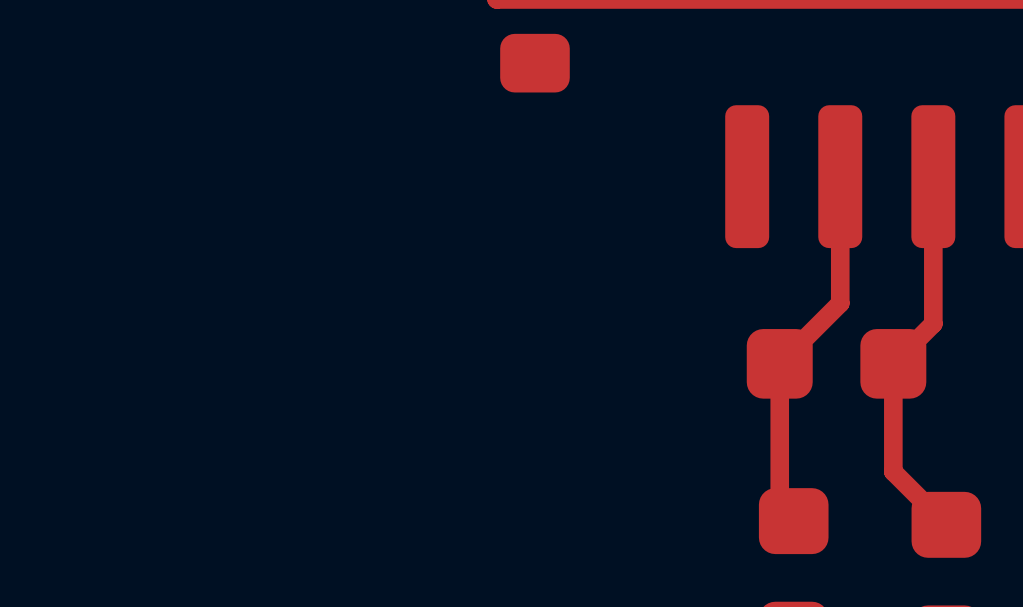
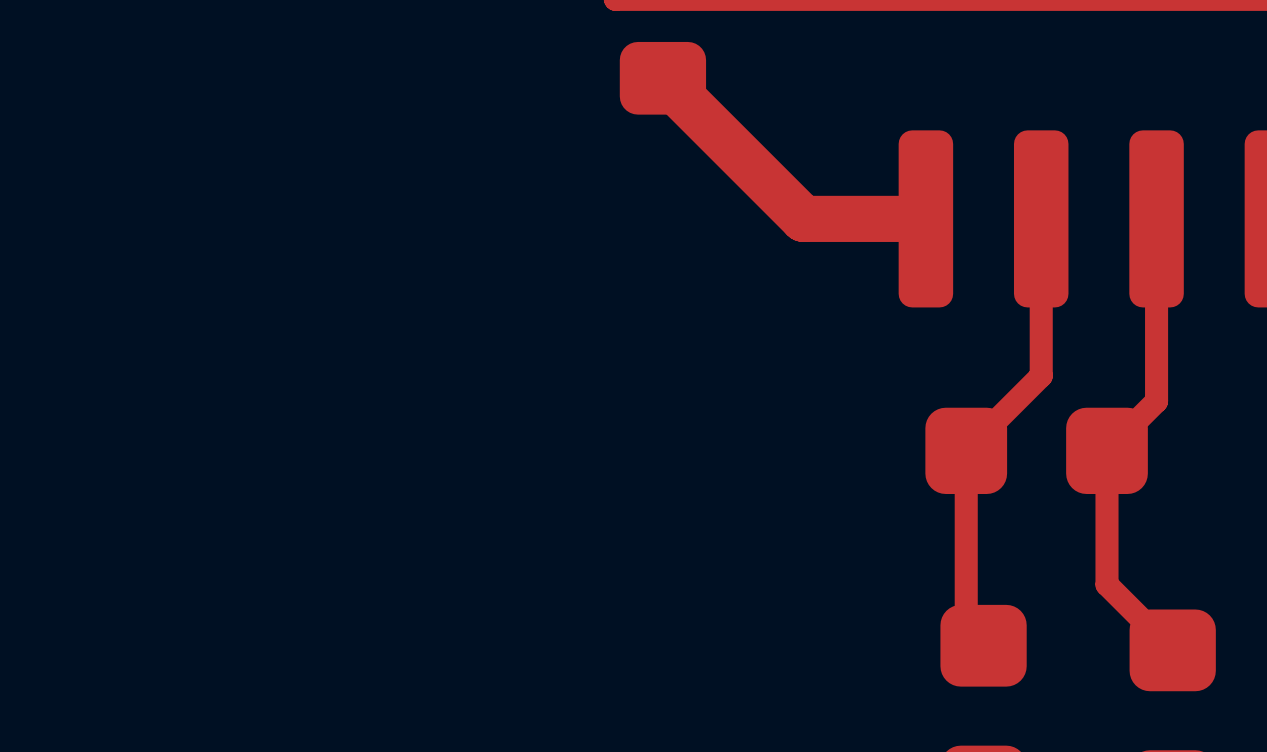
top track: none -> (662, 78) (803, 218) (925, 218)

